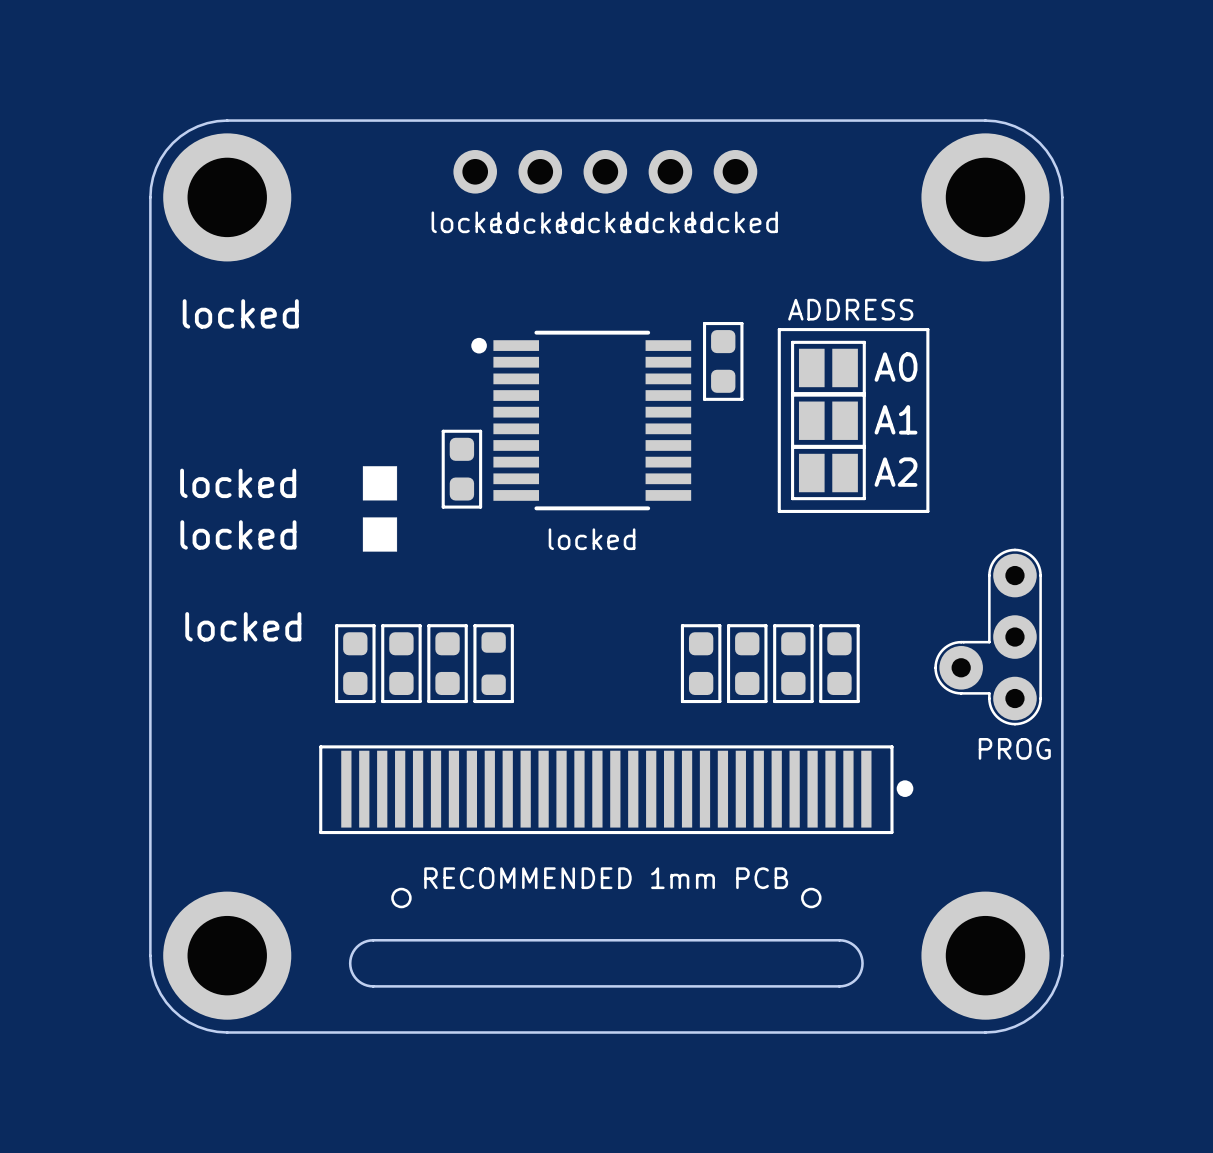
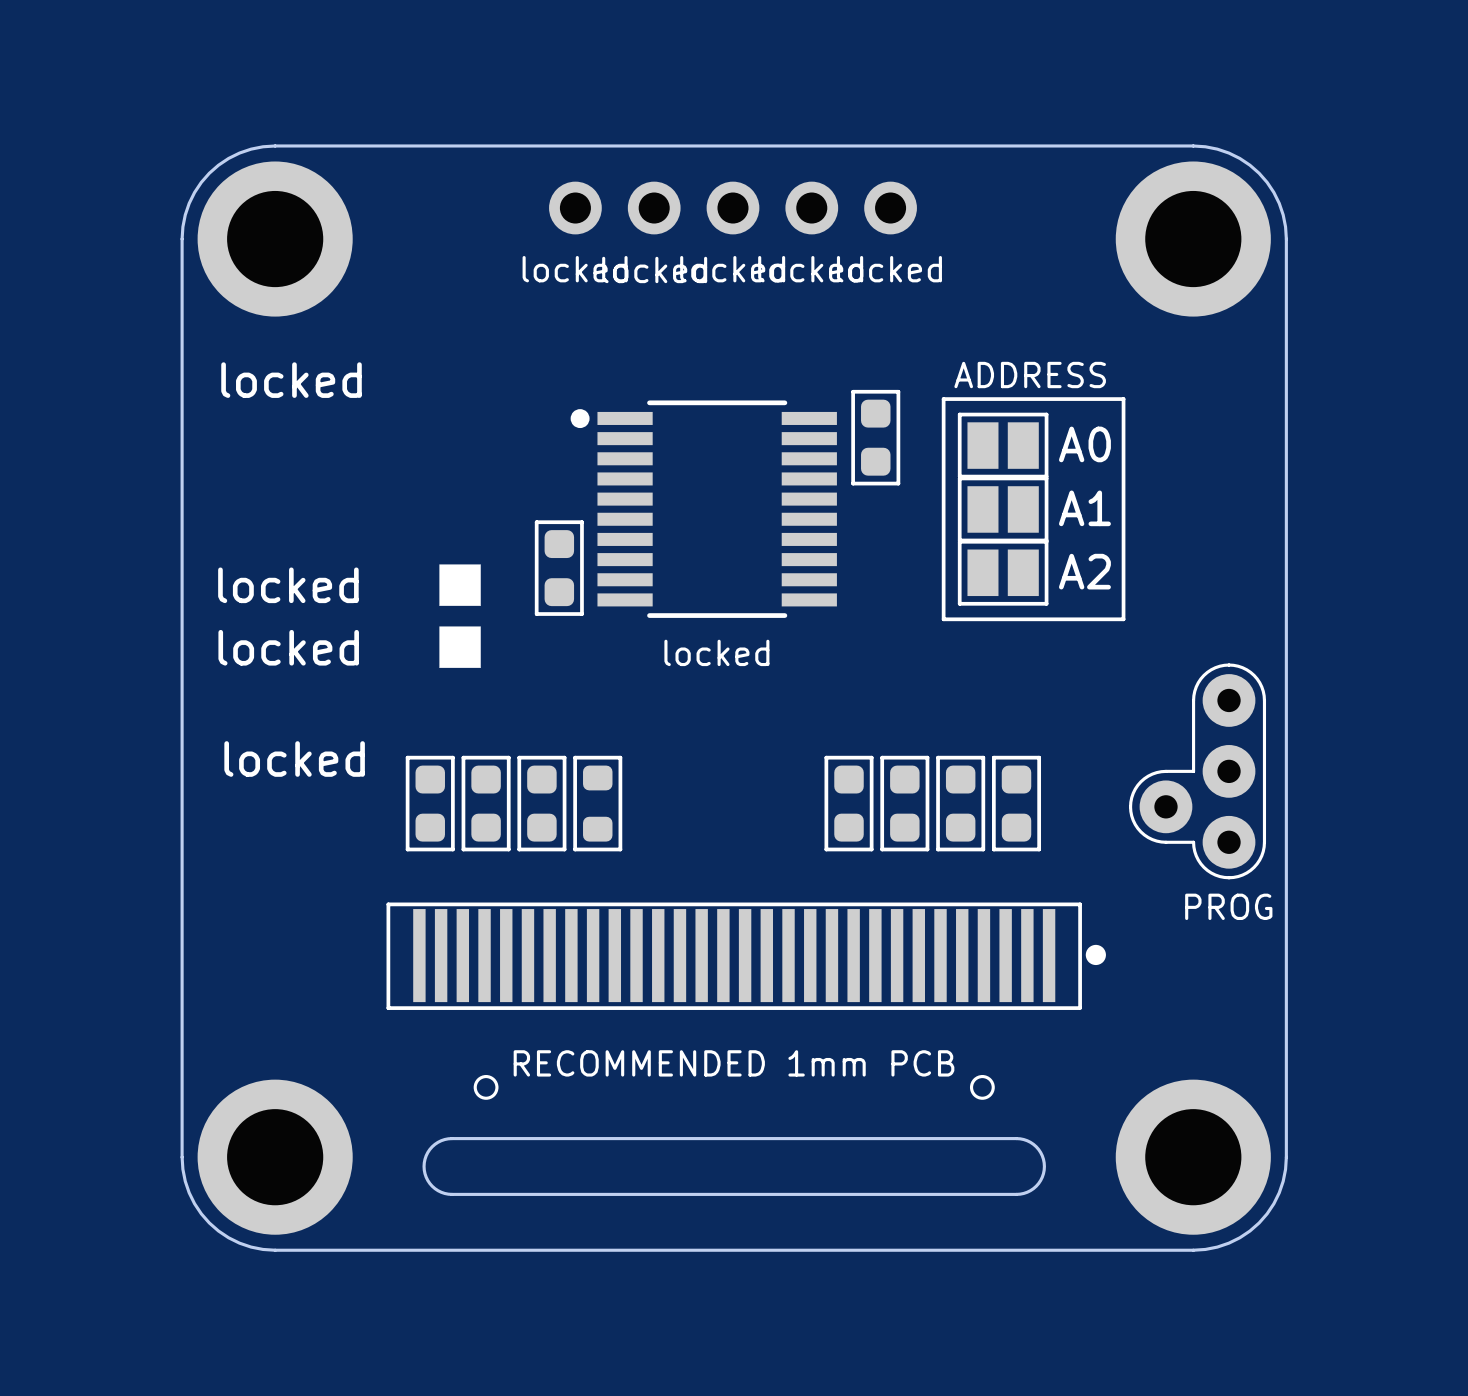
part footprint: [934, 548, 1042, 726] -> [1128, 663, 1267, 880]

